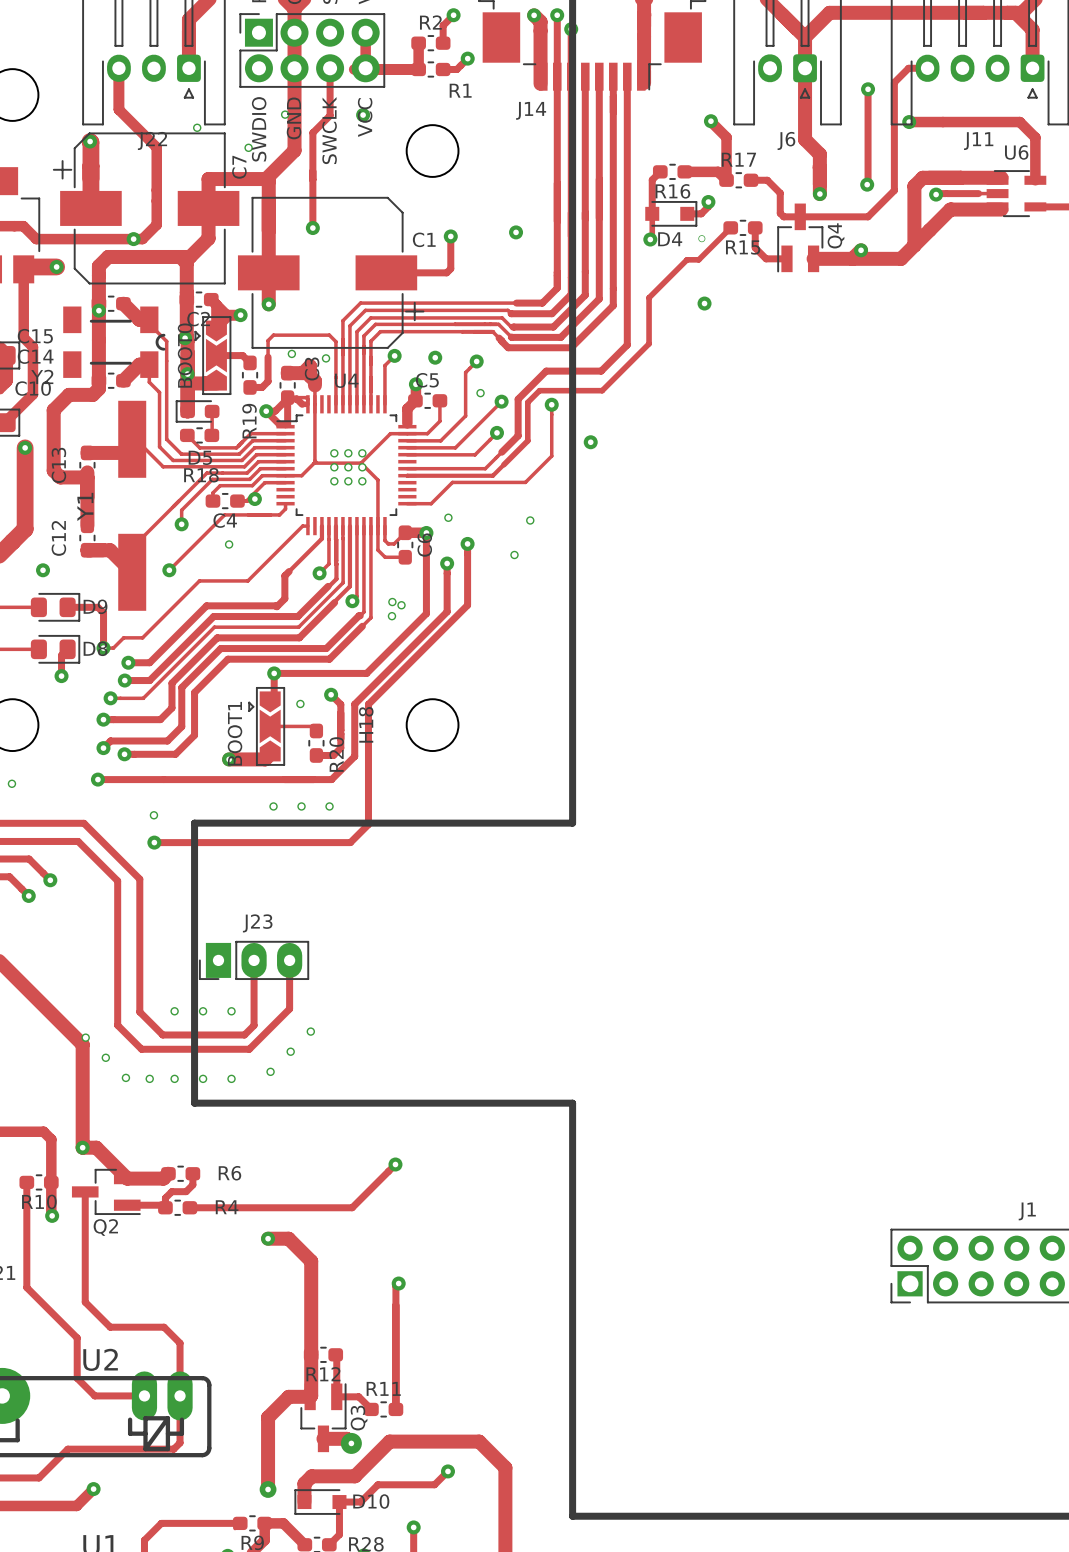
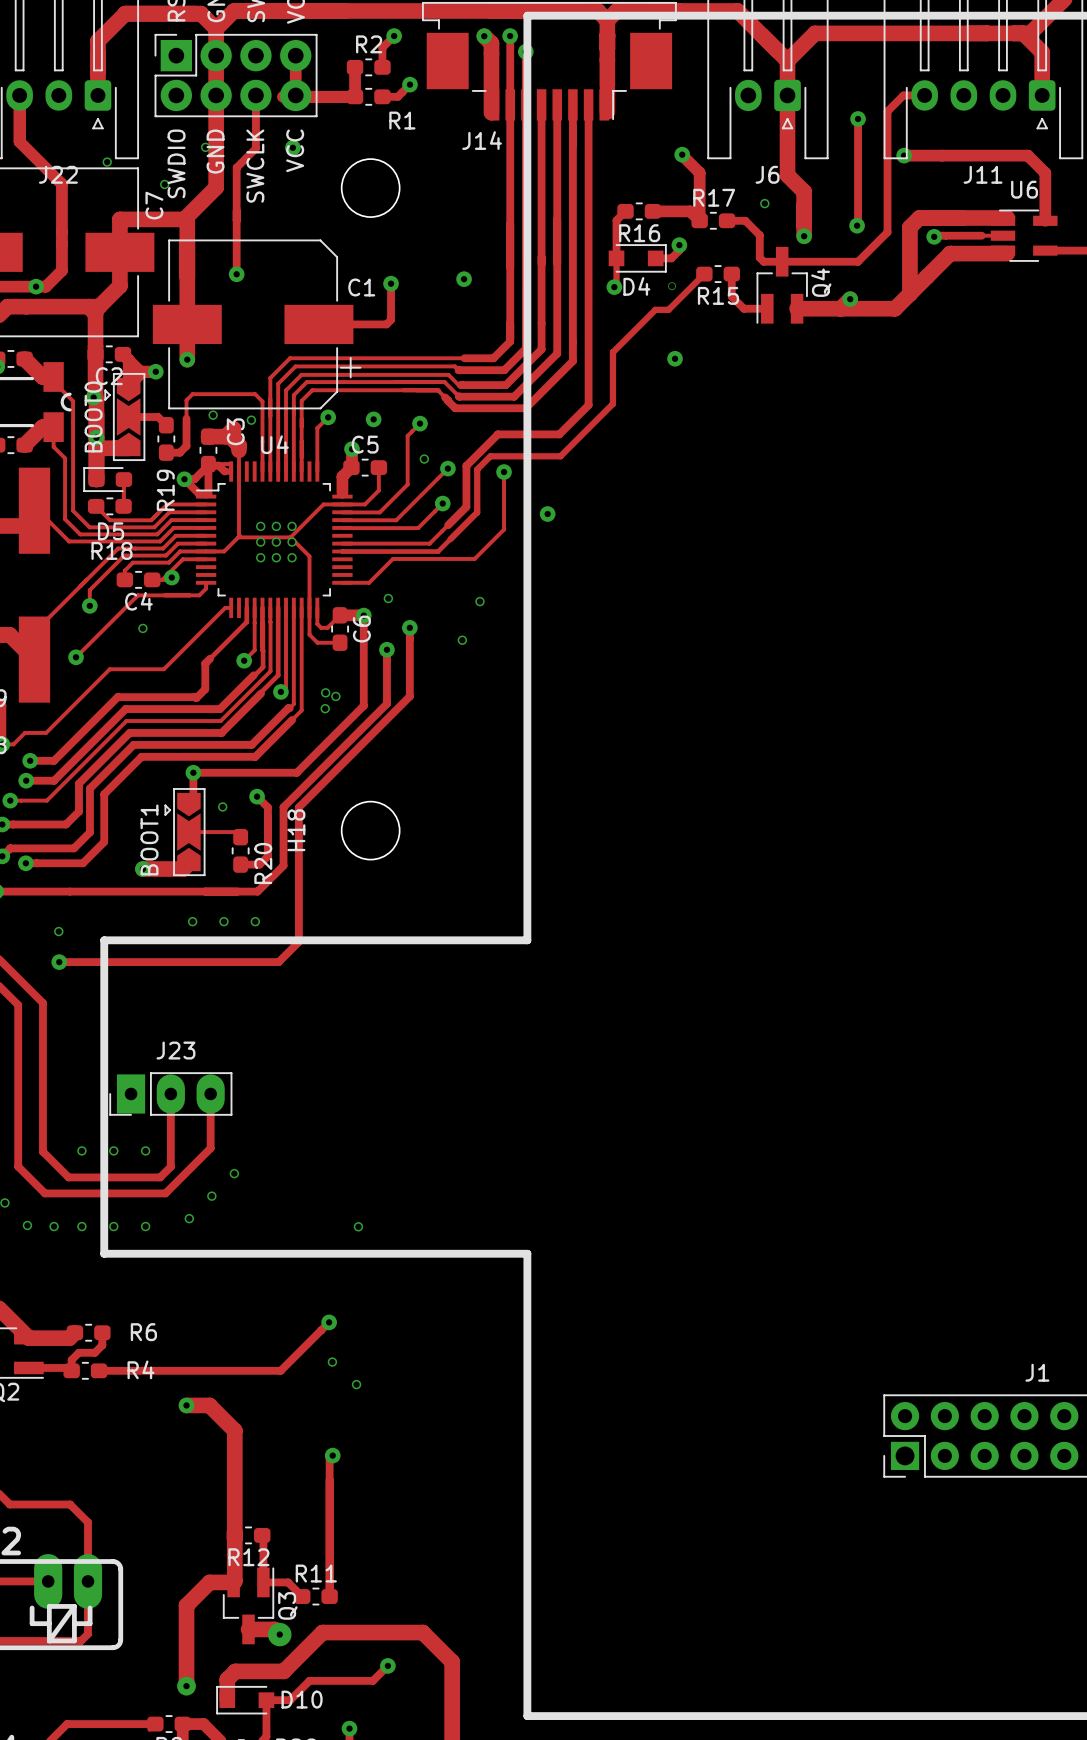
via: none -> (764, 203)
via: none -> (358, 1226)
via: none -> (332, 1362)
via: none -> (356, 1384)

